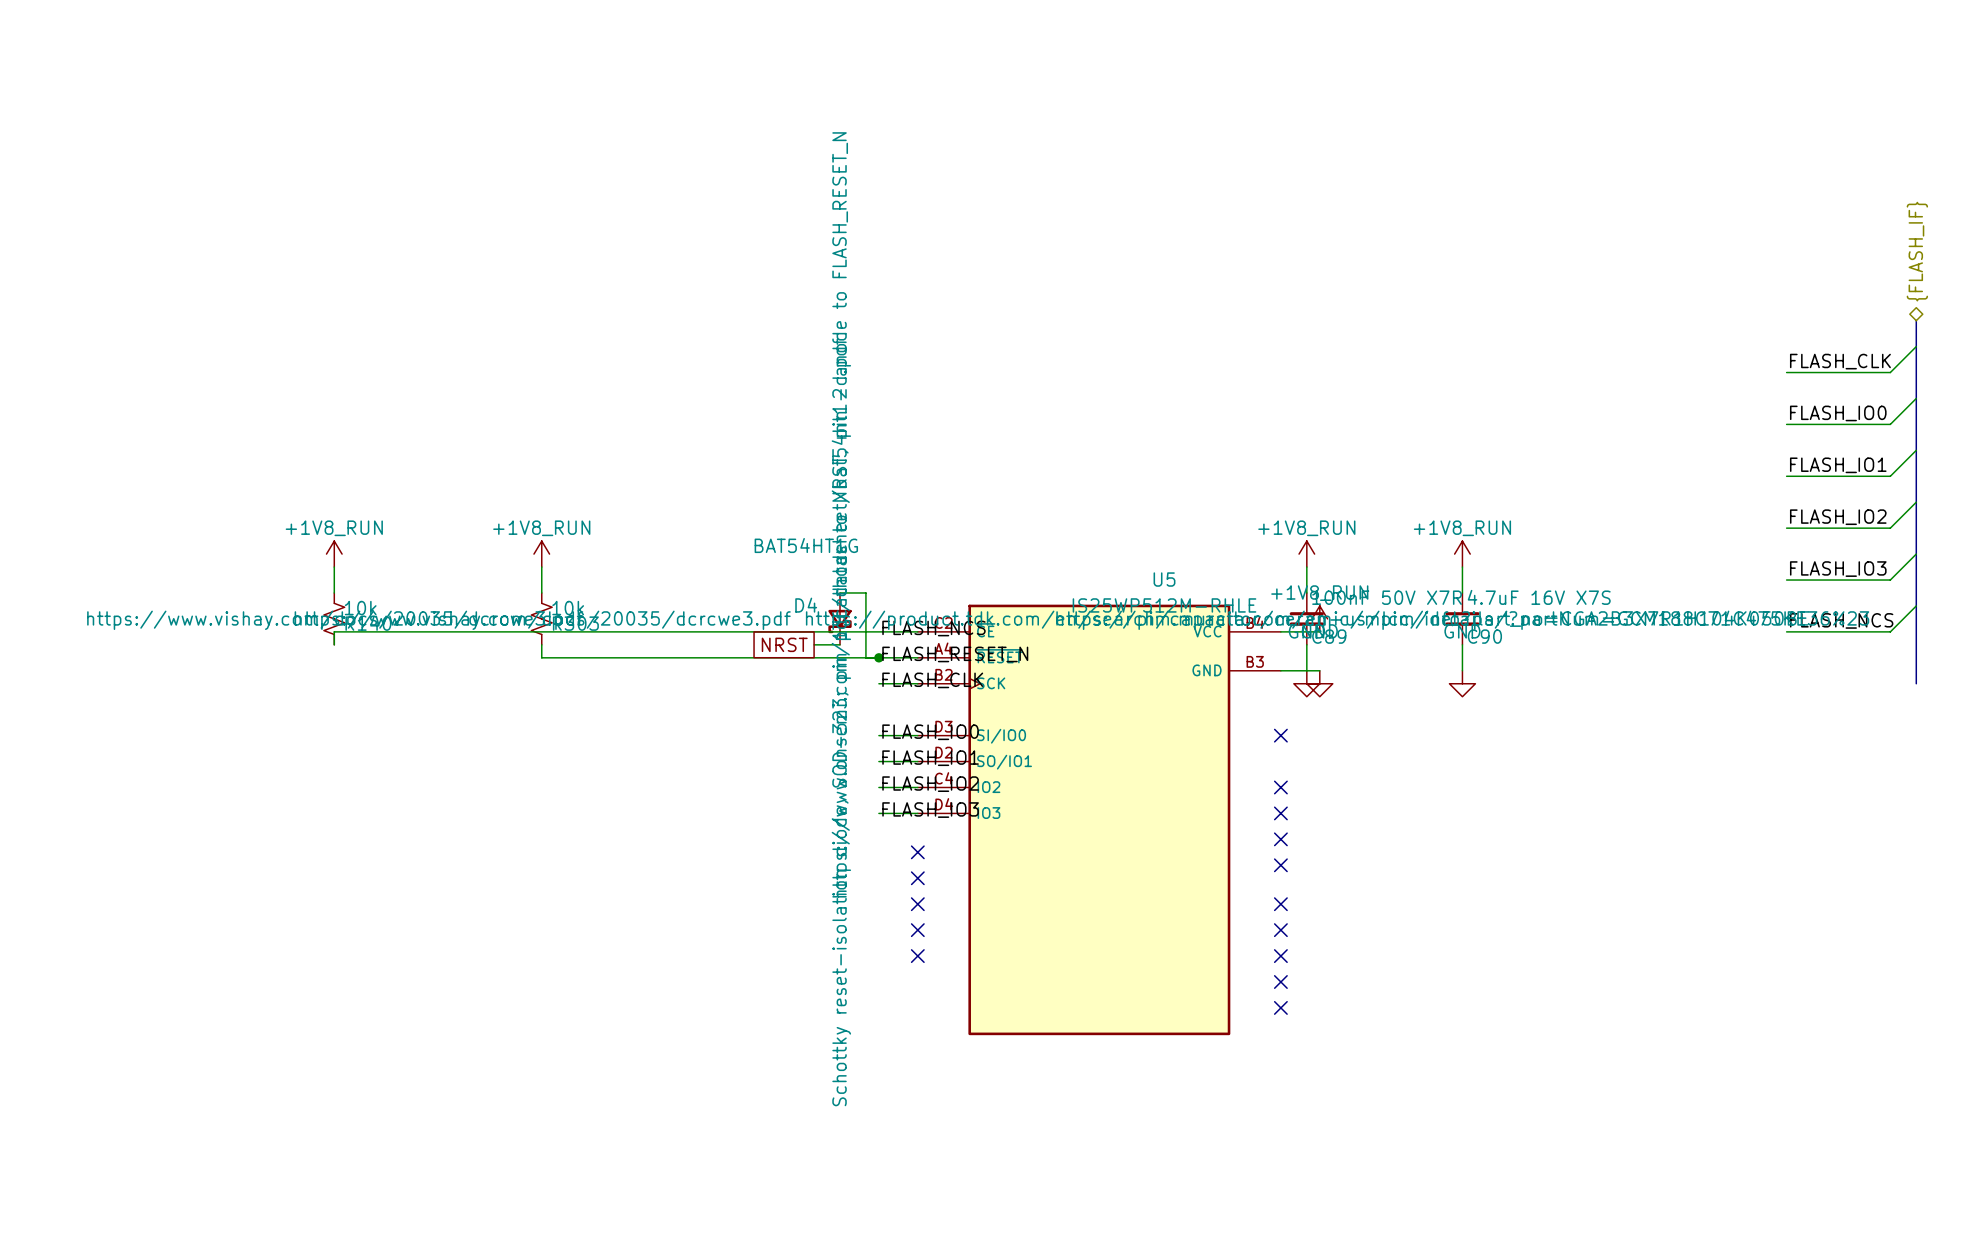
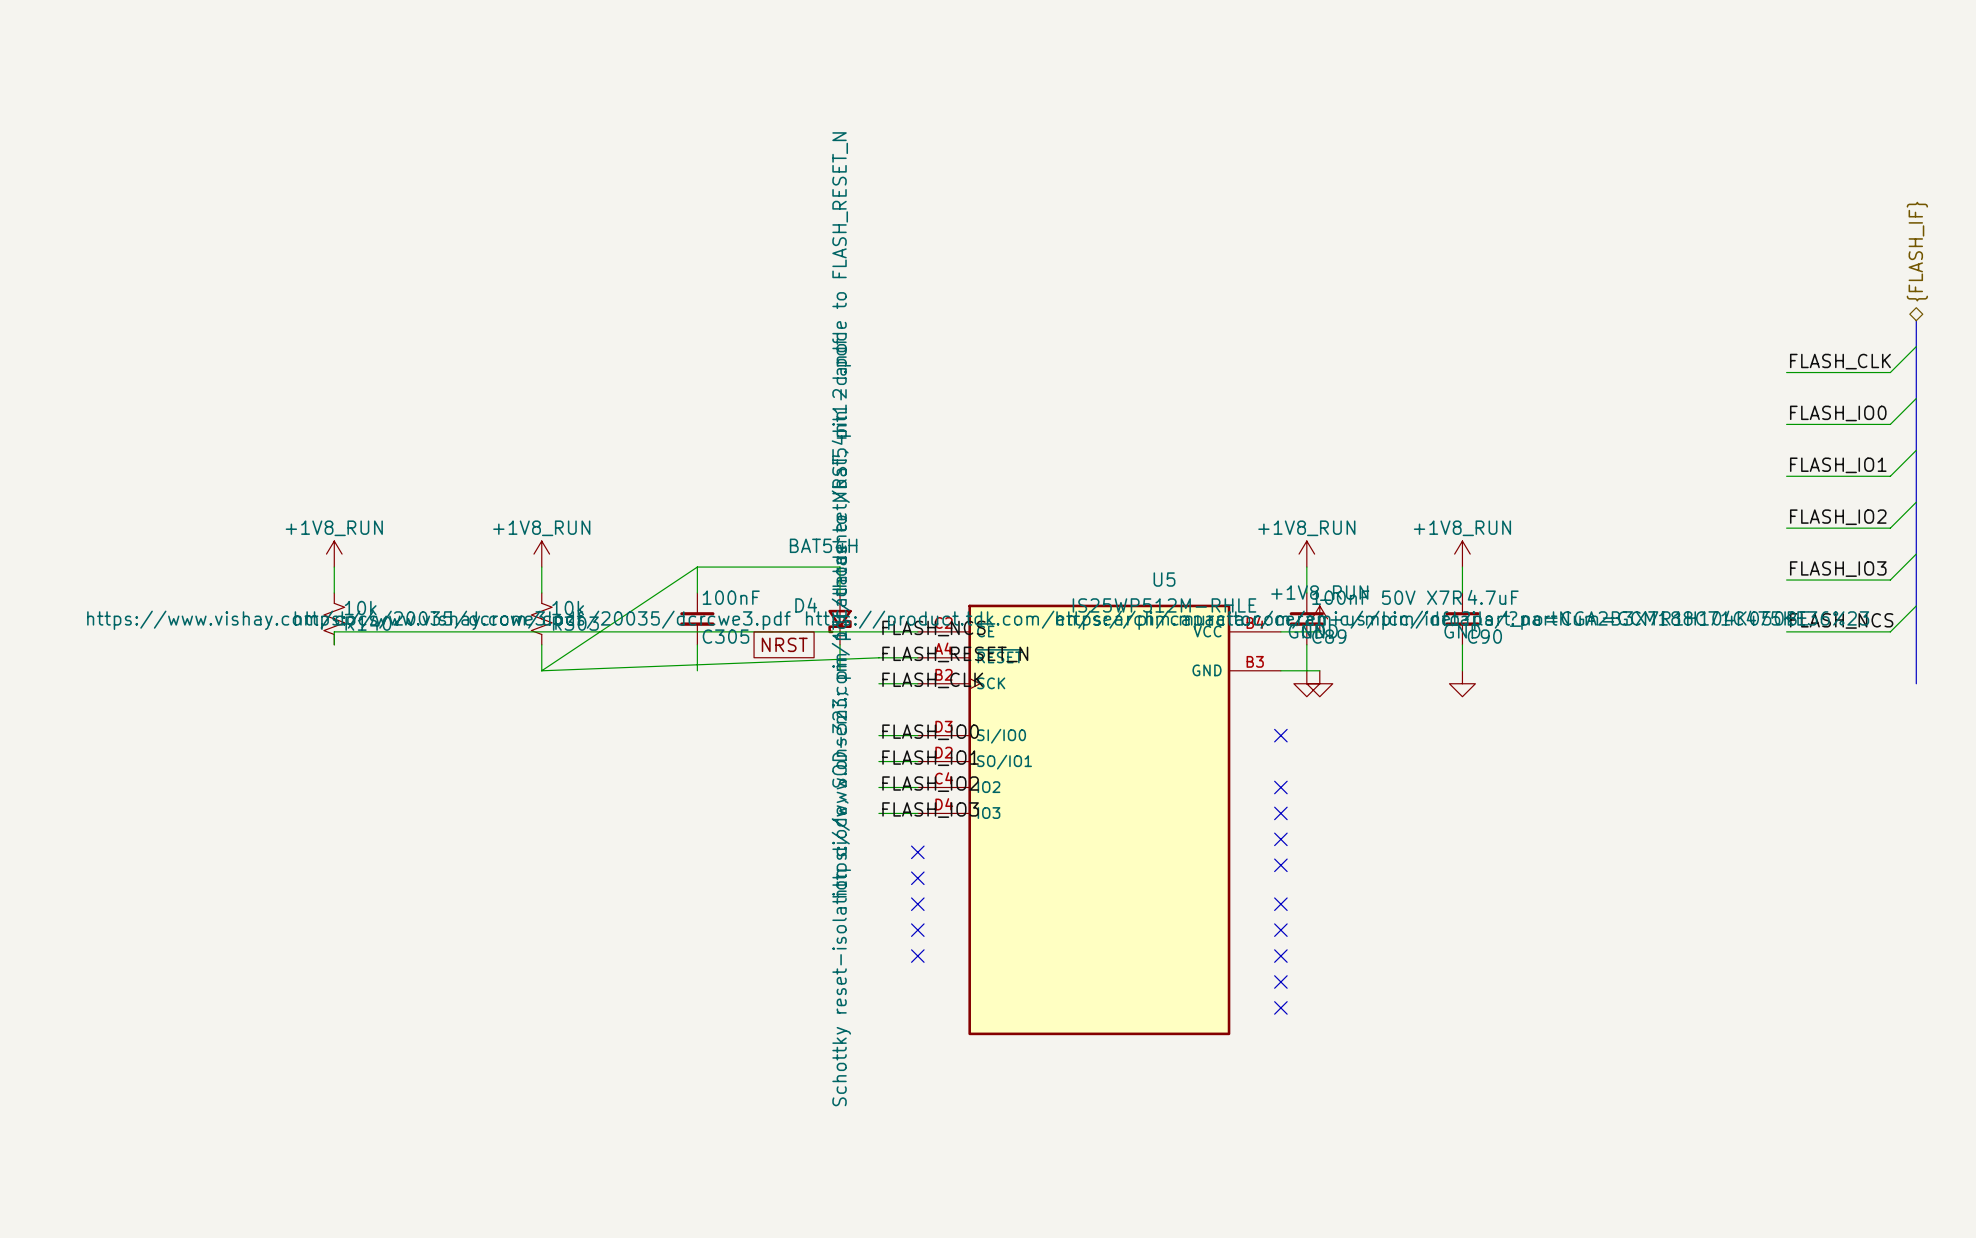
D4 value: BAT54HT1G (806, 545) -> BAT54H (823, 545)
wire: none -> (697, 567) (697, 592)
wire: none -> (697, 567) (541, 670)
wire: (840, 592) (865, 592) (865, 657) -> (840, 592) (840, 567) (697, 567)
C90 value: 4.7uF 16V X7S (1539, 597) -> 4.7uF (1493, 597)
C305: none -> 100nF (697, 618)
wire: none -> (697, 644) (697, 670)
wire: (814, 644) (840, 644) -> (840, 670) (840, 644)
wire: (541, 657) (878, 657) -> (541, 670) (878, 657)
wire: none -> (541, 657) (541, 670)
junction: (878, 657) -> none

